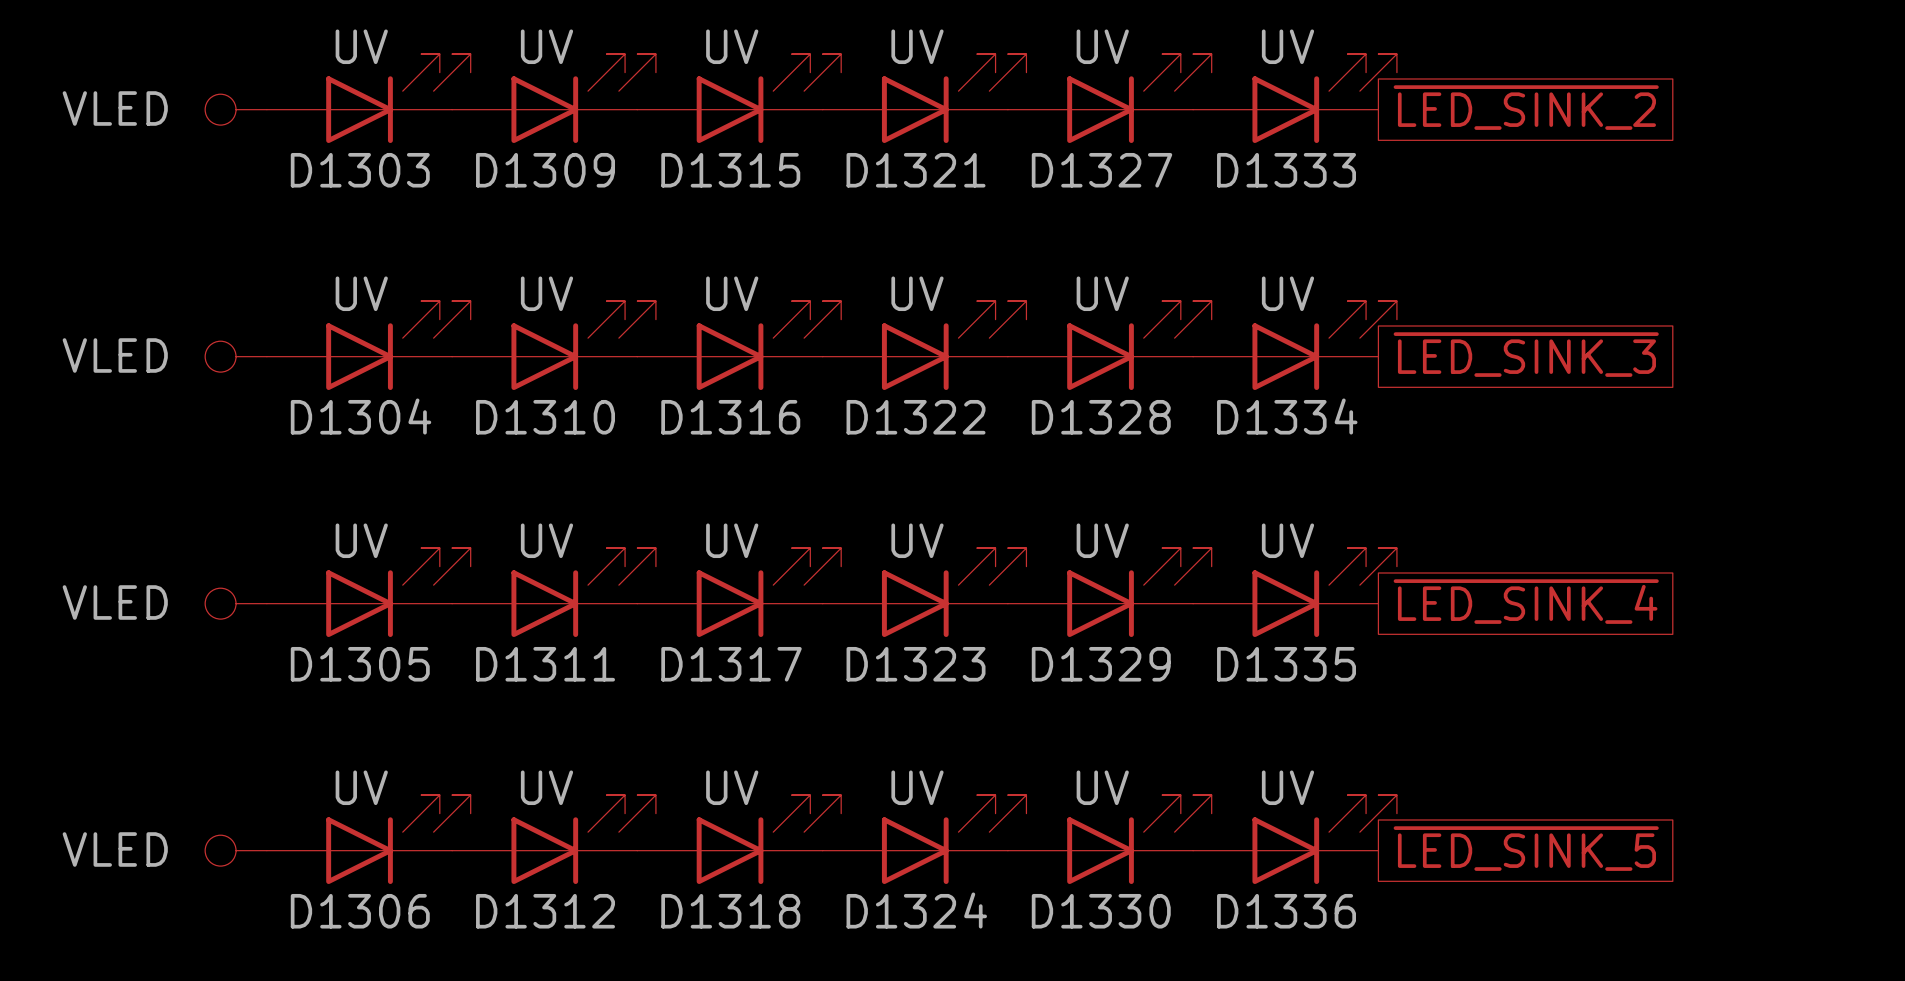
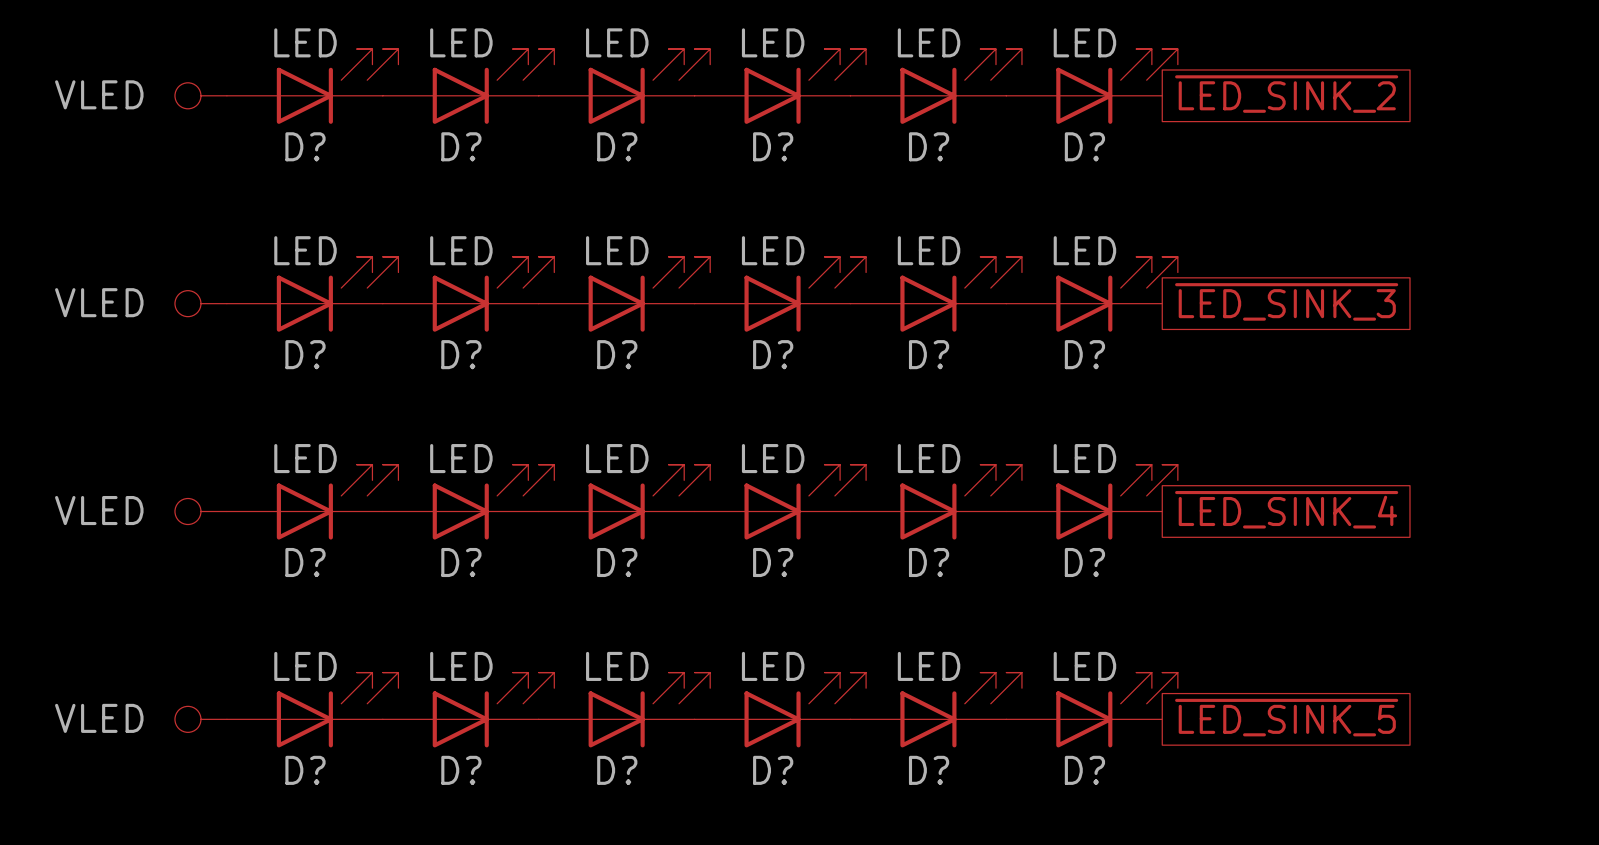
D1303 value: UV (361, 46) -> LED (305, 42)
D1309 value: UV (546, 46) -> LED (461, 42)
D1315 value: UV (732, 46) -> LED (617, 42)
D1321 value: UV (917, 46) -> LED (773, 42)
D1327 value: UV (1102, 46) -> LED (929, 42)
D1333 value: UV (1287, 46) -> LED (1084, 42)
D1303 name: D1303 (360, 170) -> D? (305, 146)
D1309 name: D1309 (545, 170) -> D? (461, 146)
D1315 name: D1315 (730, 170) -> D? (617, 146)
D1321 name: D1321 (916, 170) -> D? (773, 146)
D1327 name: D1327 (1102, 170) -> D? (929, 146)
D1333 name: D1333 (1286, 170) -> D? (1084, 146)
D1304 value: UV (361, 293) -> LED (305, 250)
D1310 value: UV (546, 293) -> LED (461, 250)
D1316 value: UV (732, 293) -> LED (617, 250)
D1322 value: UV (917, 293) -> LED (773, 250)
D1328 value: UV (1102, 293) -> LED (929, 250)
D1334 value: UV (1287, 293) -> LED (1084, 250)
D1304 name: D1304 (361, 416) -> D? (305, 354)
D1334 name: D1334 (1287, 416) -> D? (1084, 354)
D1310 name: D1310 (545, 417) -> D? (461, 354)
D1316 name: D1316 (730, 417) -> D? (617, 354)
D1322 name: D1322 (916, 417) -> D? (773, 354)
D1328 name: D1328 (1101, 417) -> D? (929, 354)
D1305 value: UV (361, 540) -> LED (305, 458)
D1311 value: UV (546, 540) -> LED (461, 458)
D1317 value: UV (732, 540) -> LED (617, 458)
D1323 value: UV (917, 540) -> LED (773, 458)
D1329 value: UV (1102, 540) -> LED (929, 458)
D1335 value: UV (1287, 540) -> LED (1084, 458)
D1305 name: D1305 (360, 664) -> D? (305, 562)
D1311 name: D1311 (545, 664) -> D? (461, 562)
D1317 name: D1317 (731, 664) -> D? (617, 562)
D1323 name: D1323 (916, 664) -> D? (773, 562)
D1329 name: D1329 (1101, 664) -> D? (929, 562)
D1335 name: D1335 (1286, 664) -> D? (1084, 562)
D1306 value: UV (361, 787) -> LED (305, 666)
D1312 value: UV (546, 787) -> LED (461, 666)
D1318 value: UV (732, 787) -> LED (617, 666)
D1324 value: UV (917, 787) -> LED (773, 666)
D1330 value: UV (1102, 787) -> LED (929, 666)
D1336 value: UV (1287, 787) -> LED (1084, 666)
D1324 name: D1324 (916, 910) -> D? (773, 770)
D1306 name: D1306 (360, 911) -> D? (305, 770)
D1312 name: D1312 (545, 911) -> D? (461, 770)
D1318 name: D1318 (730, 911) -> D? (617, 770)
D1330 name: D1330 (1101, 911) -> D? (929, 770)
D1336 name: D1336 (1286, 911) -> D? (1084, 770)

